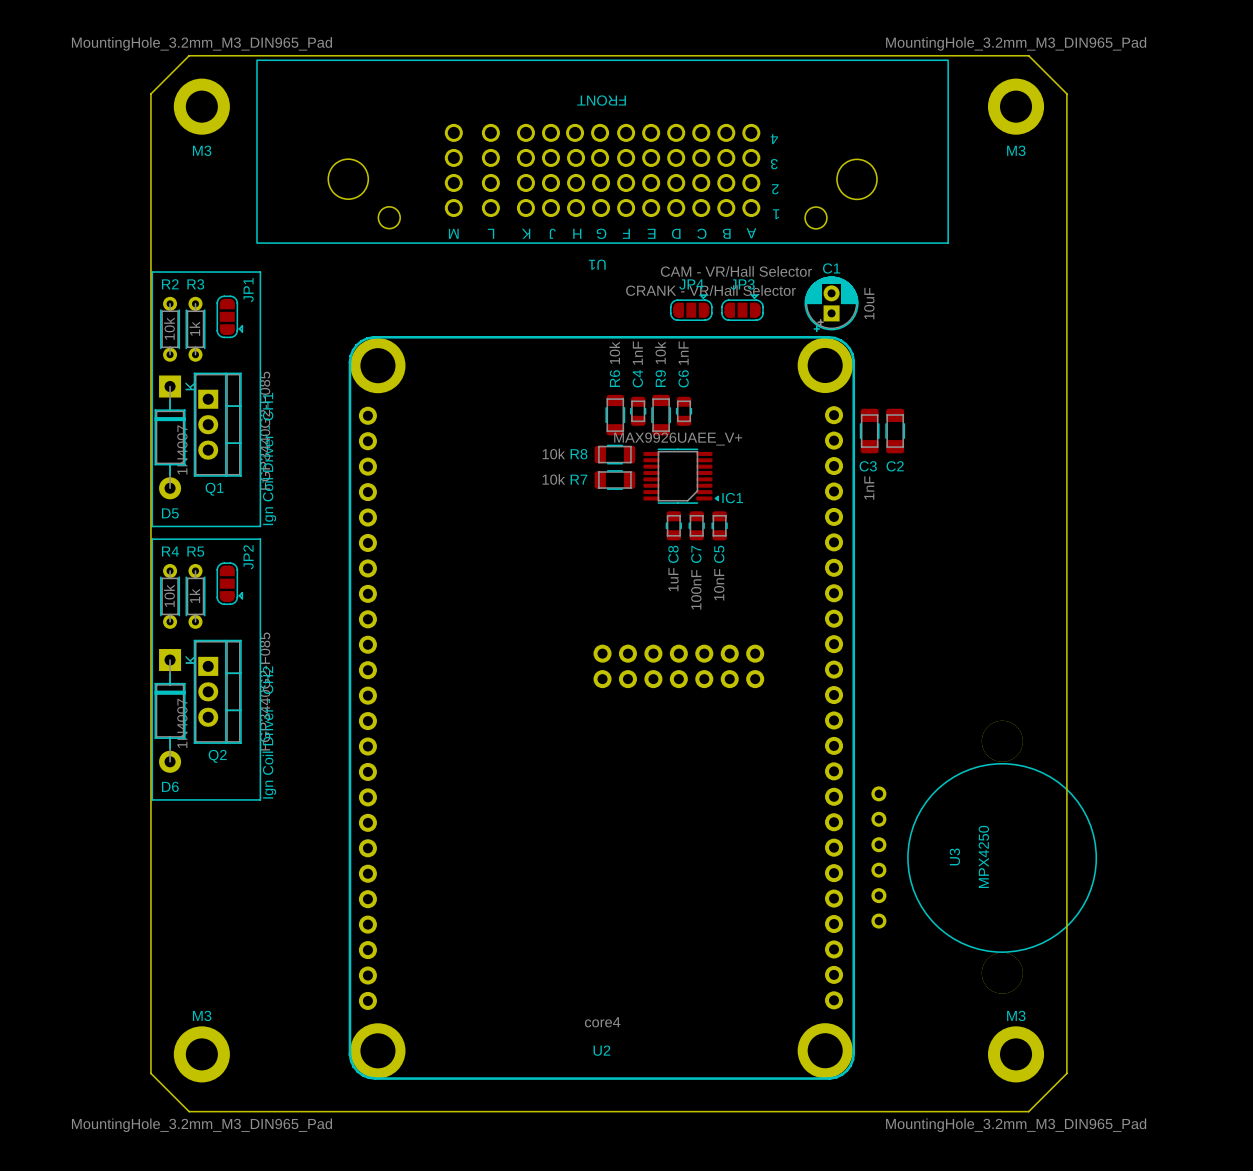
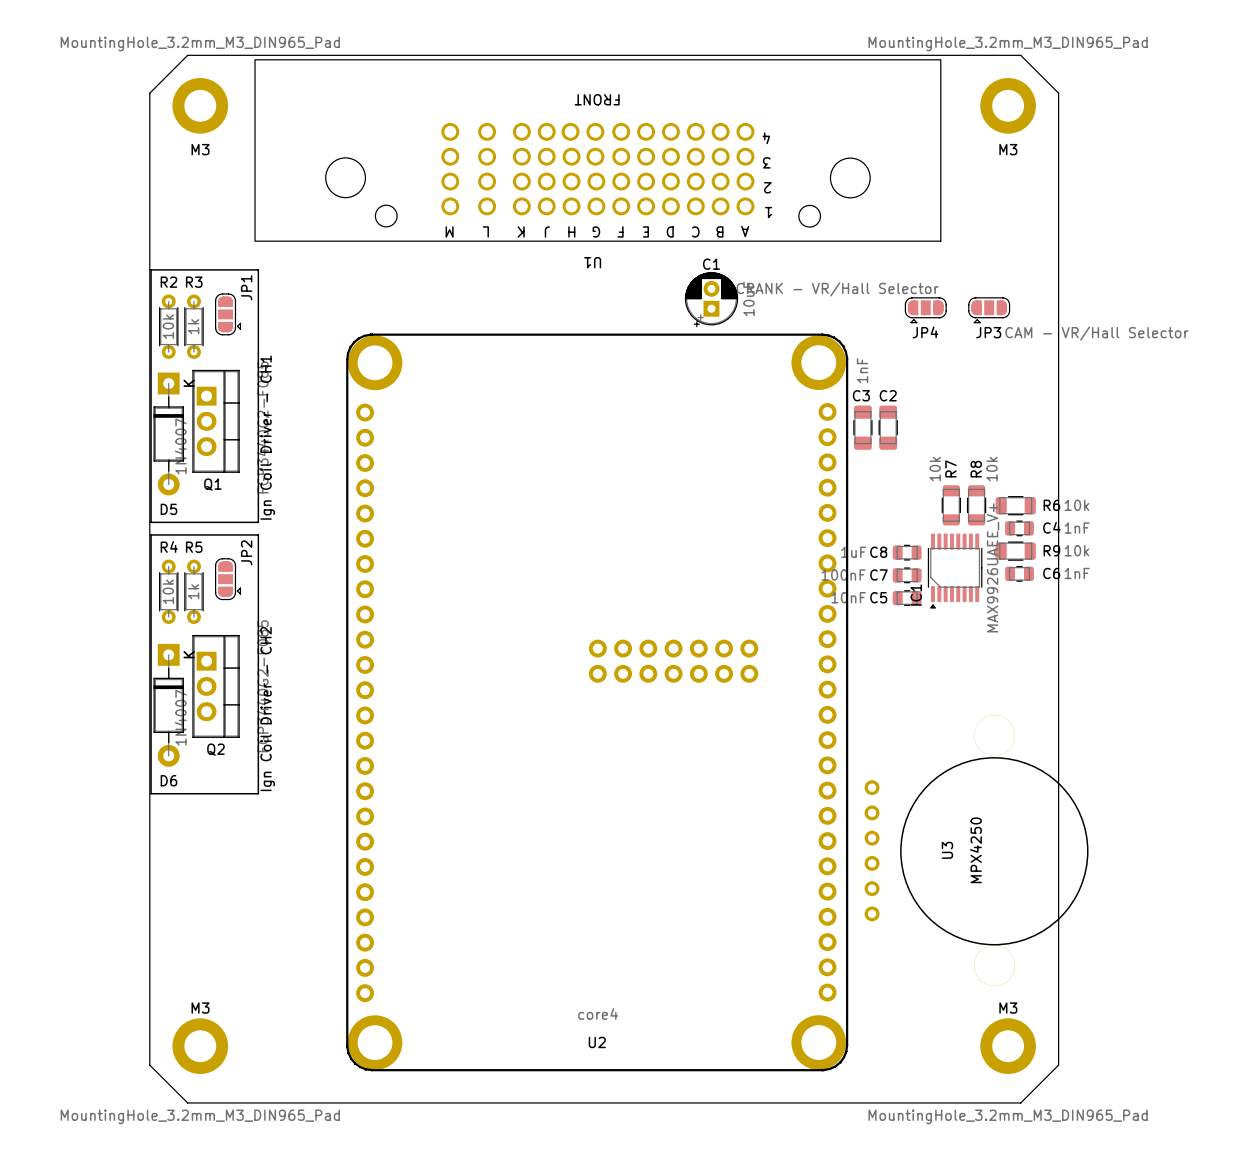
JP3 value position: CAM - VR/Hall Selector (736, 271) -> CAM - VR/Hall Selector (1096, 333)
JP4 value position: CRANK - VR/Hall Selector (710, 290) -> CRANK - VR/Hall Selector (837, 289)
C1 position: (831, 304) -> (711, 299)
JP4 rotation: 0° (691, 307) -> 180° (925, 310)
JP4 position: (691, 307) -> (925, 310)
JP3 rotation: 0° (742, 307) -> 180° (989, 310)
JP3 position: (742, 307) -> (989, 310)
C4 rotation: 0° (638, 411) -> 90° clockwise (1019, 528)
C4 position: (638, 411) -> (1019, 528)
C6 rotation: 0° (684, 411) -> 90° clockwise (1019, 573)
C6 position: (684, 411) -> (1019, 573)
R6 rotation: 0° (615, 415) -> 90° clockwise (1015, 505)
R6 position: (615, 415) -> (1015, 505)
R9 rotation: 0° (661, 415) -> 90° clockwise (1015, 551)
R9 position: (661, 415) -> (1015, 551)
R8 value position: 10k (553, 454) -> 10k (992, 469)
R8 rotation: 0° (614, 454) -> 90° clockwise (976, 505)
R8 position: (614, 454) -> (976, 505)
C3 name position: C3 (868, 466) -> C3 (861, 395)
C2 name position: C2 (895, 466) -> C2 (888, 395)
IC1 rotation: 0° (681, 476) -> 90° clockwise (955, 571)
IC1 position: (681, 476) -> (955, 571)
R7 value position: 10k (553, 479) -> 10k (935, 469)
R7 rotation: 0° (614, 480) -> 90° clockwise (951, 505)
R7 position: (614, 480) -> (951, 505)
C3 value position: 1nF (869, 488) -> 1nF (862, 370)
IC1 name position: IC1 (732, 498) -> IC1 (916, 595)
C8 rotation: 0° (673, 525) -> 90° clockwise (907, 552)
C8 position: (673, 525) -> (907, 552)
C7 rotation: 0° (696, 525) -> 90° clockwise (907, 575)
C7 position: (696, 525) -> (907, 575)
C5 rotation: 0° (719, 525) -> 90° clockwise (907, 598)
C5 position: (719, 525) -> (907, 598)

